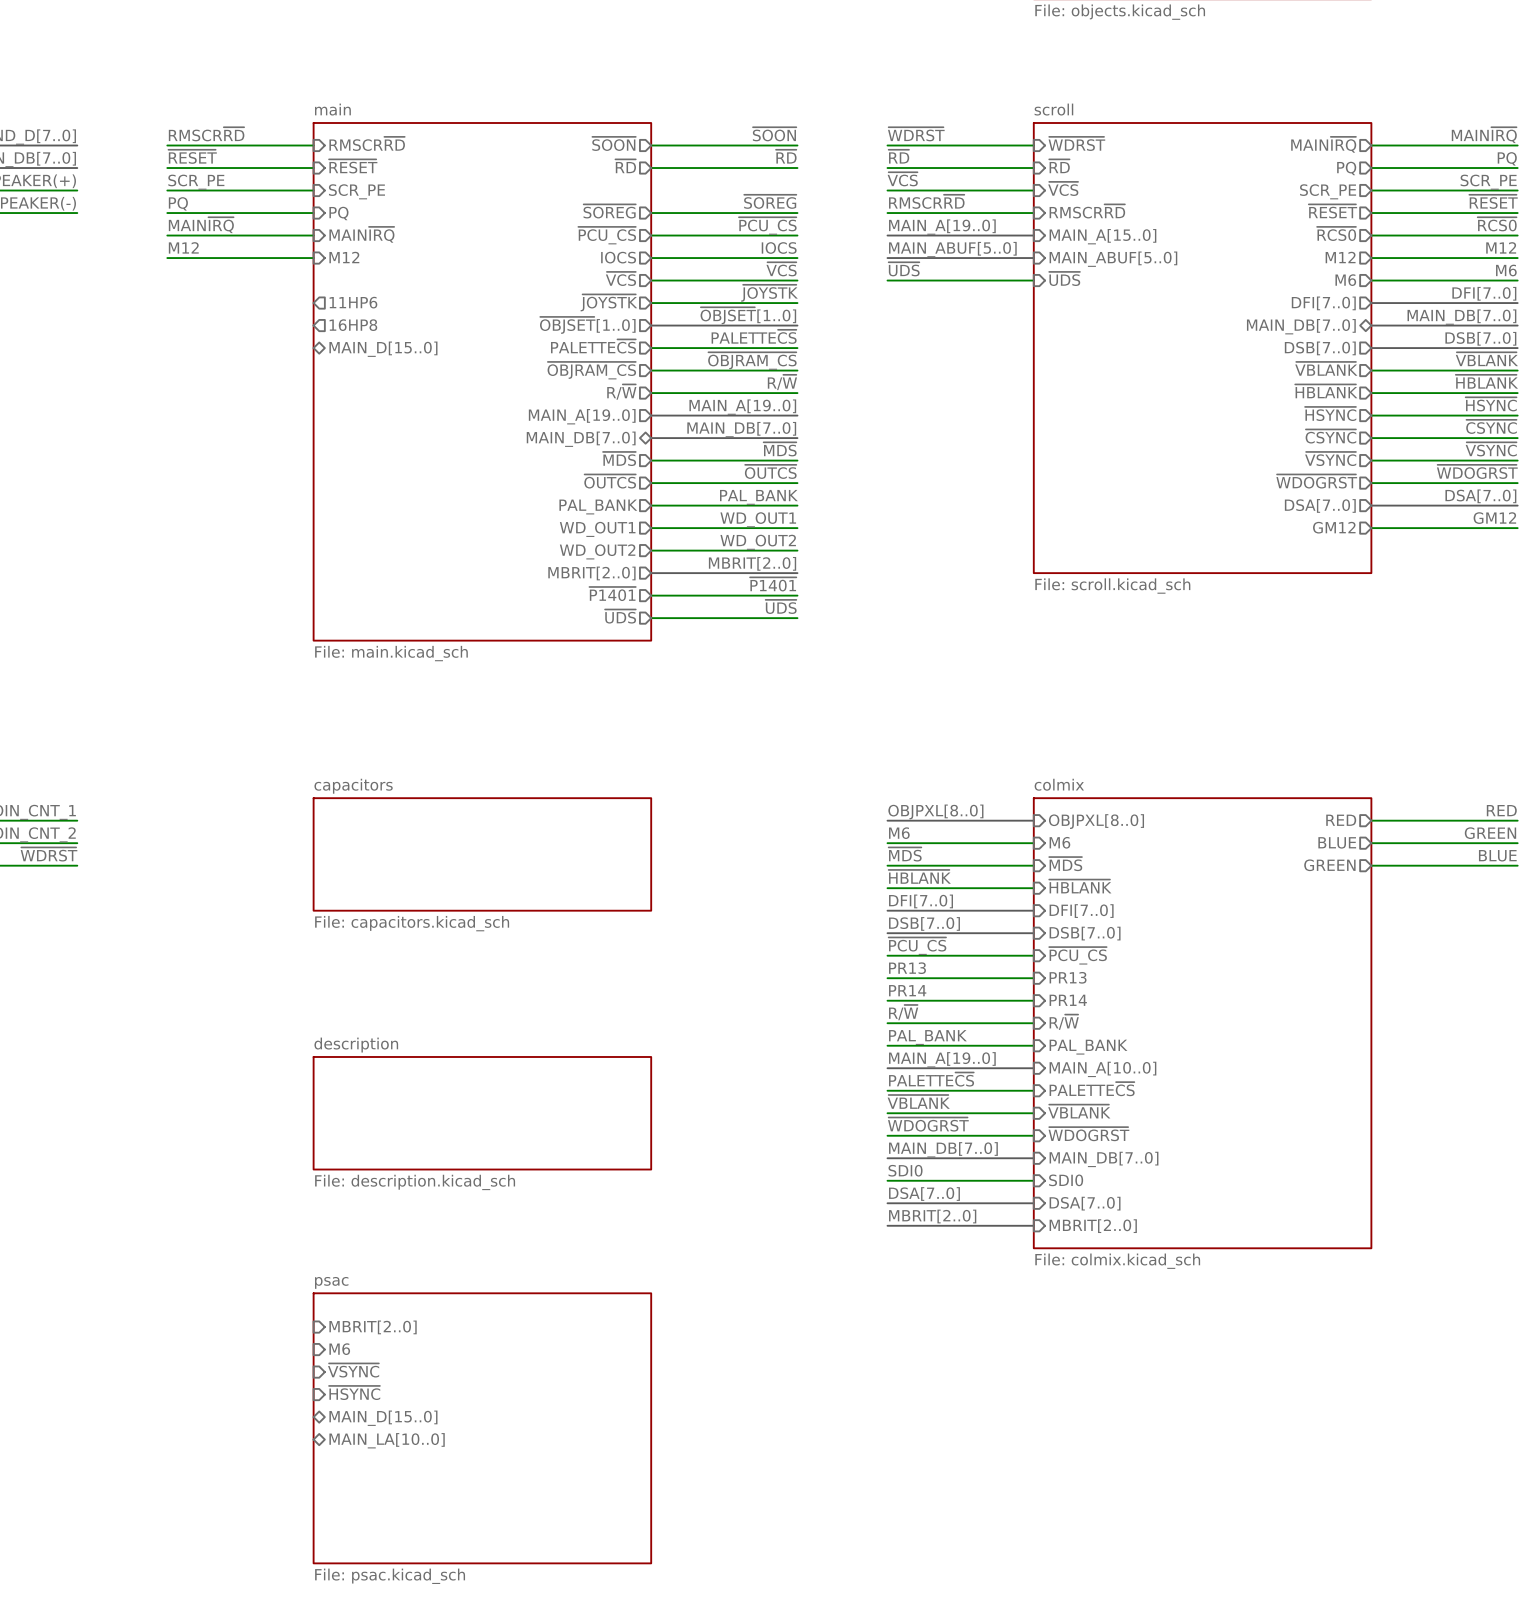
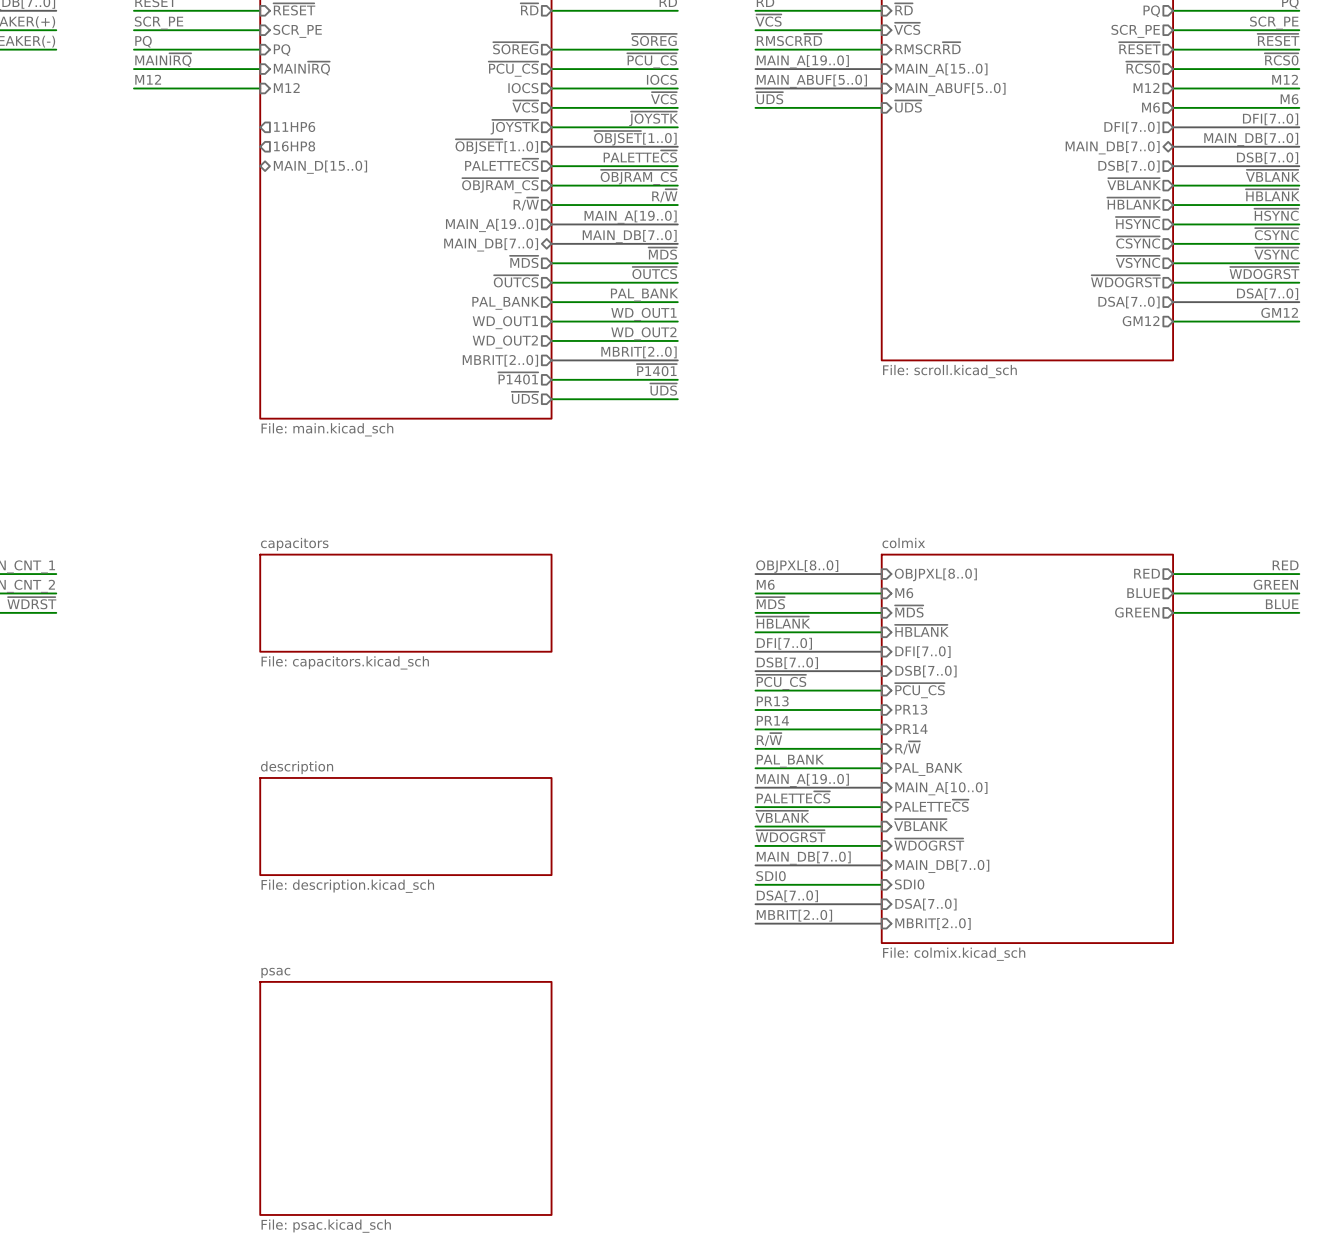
sheet pin: MBRIT[2..0] (373, 1327) -> none
sheet pin: M6 (339, 1349) -> none
sheet pin: ~{VSYNC} (353, 1370) -> none
sheet pin: ~{HSYNC} (354, 1392) -> none
sheet pin: MAIN_D[15..0] (383, 1418) -> none
sheet pin: MAIN_LA[10..0] (387, 1440) -> none

